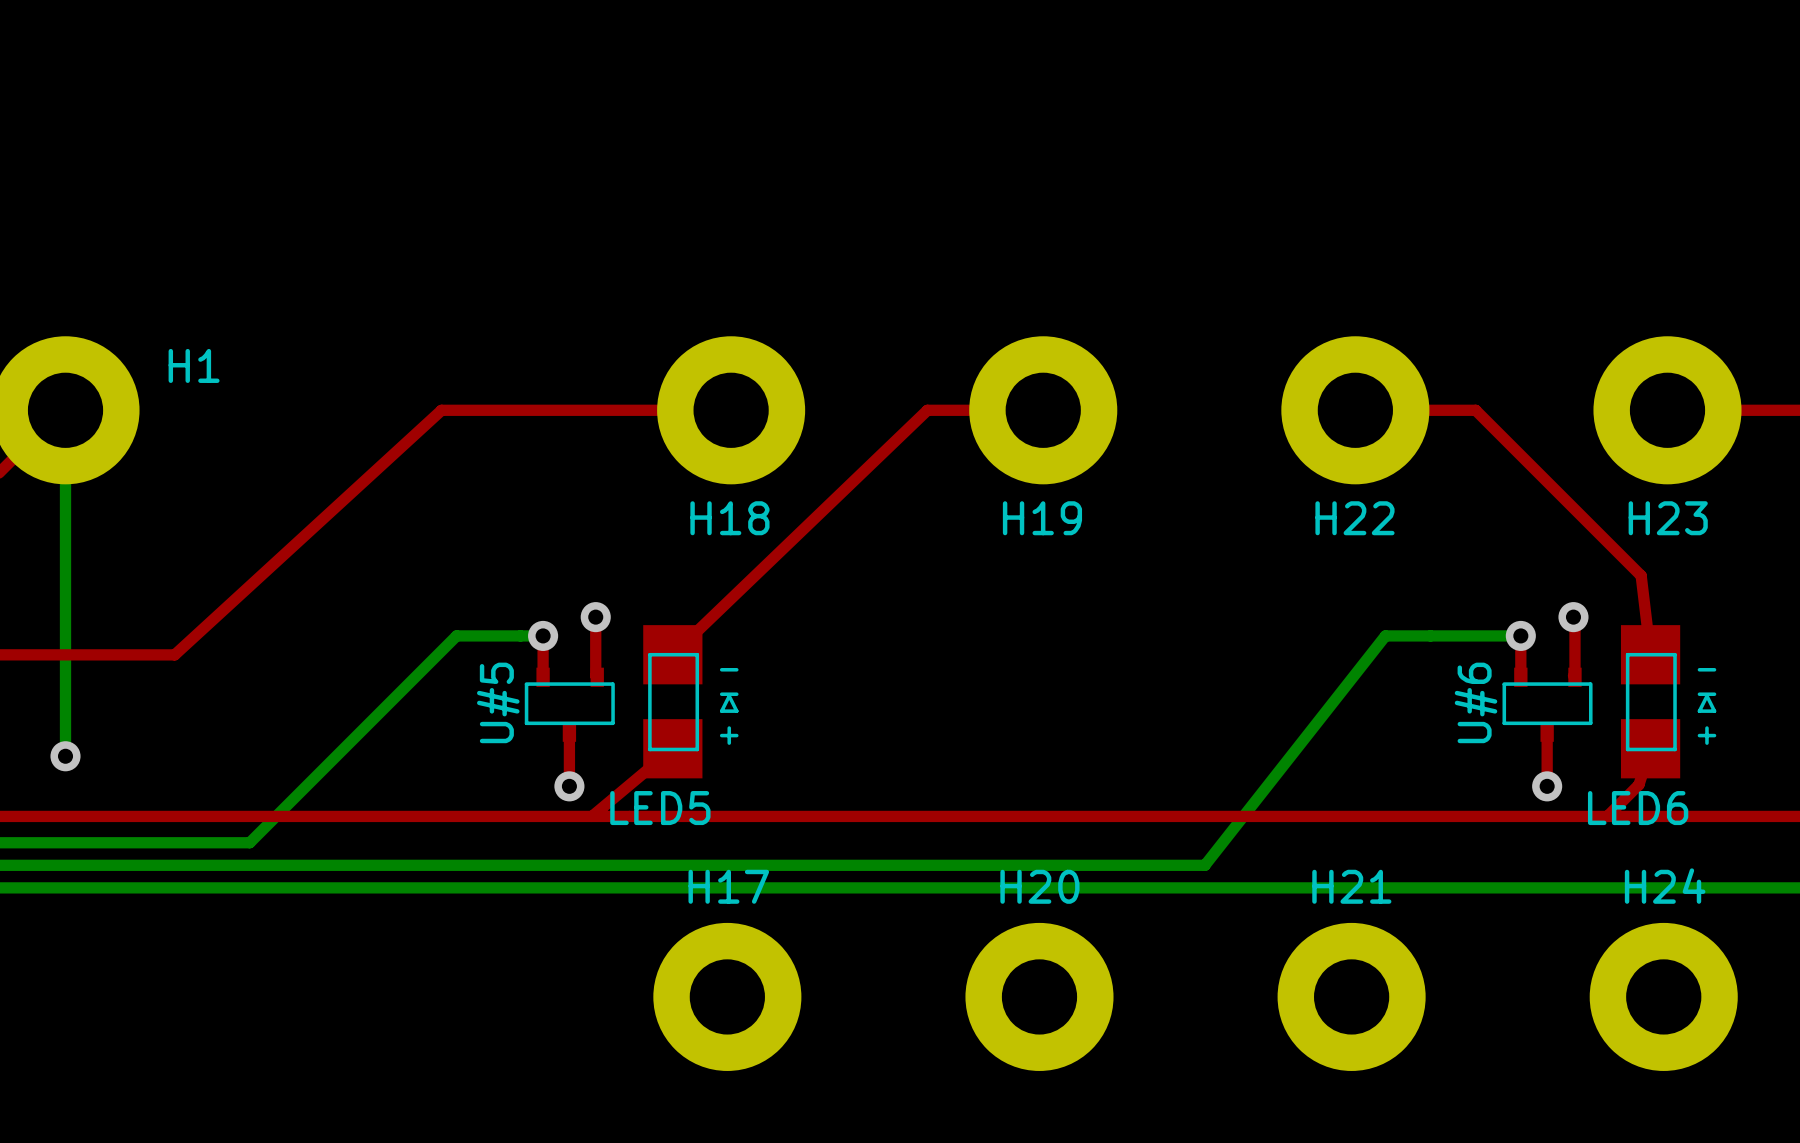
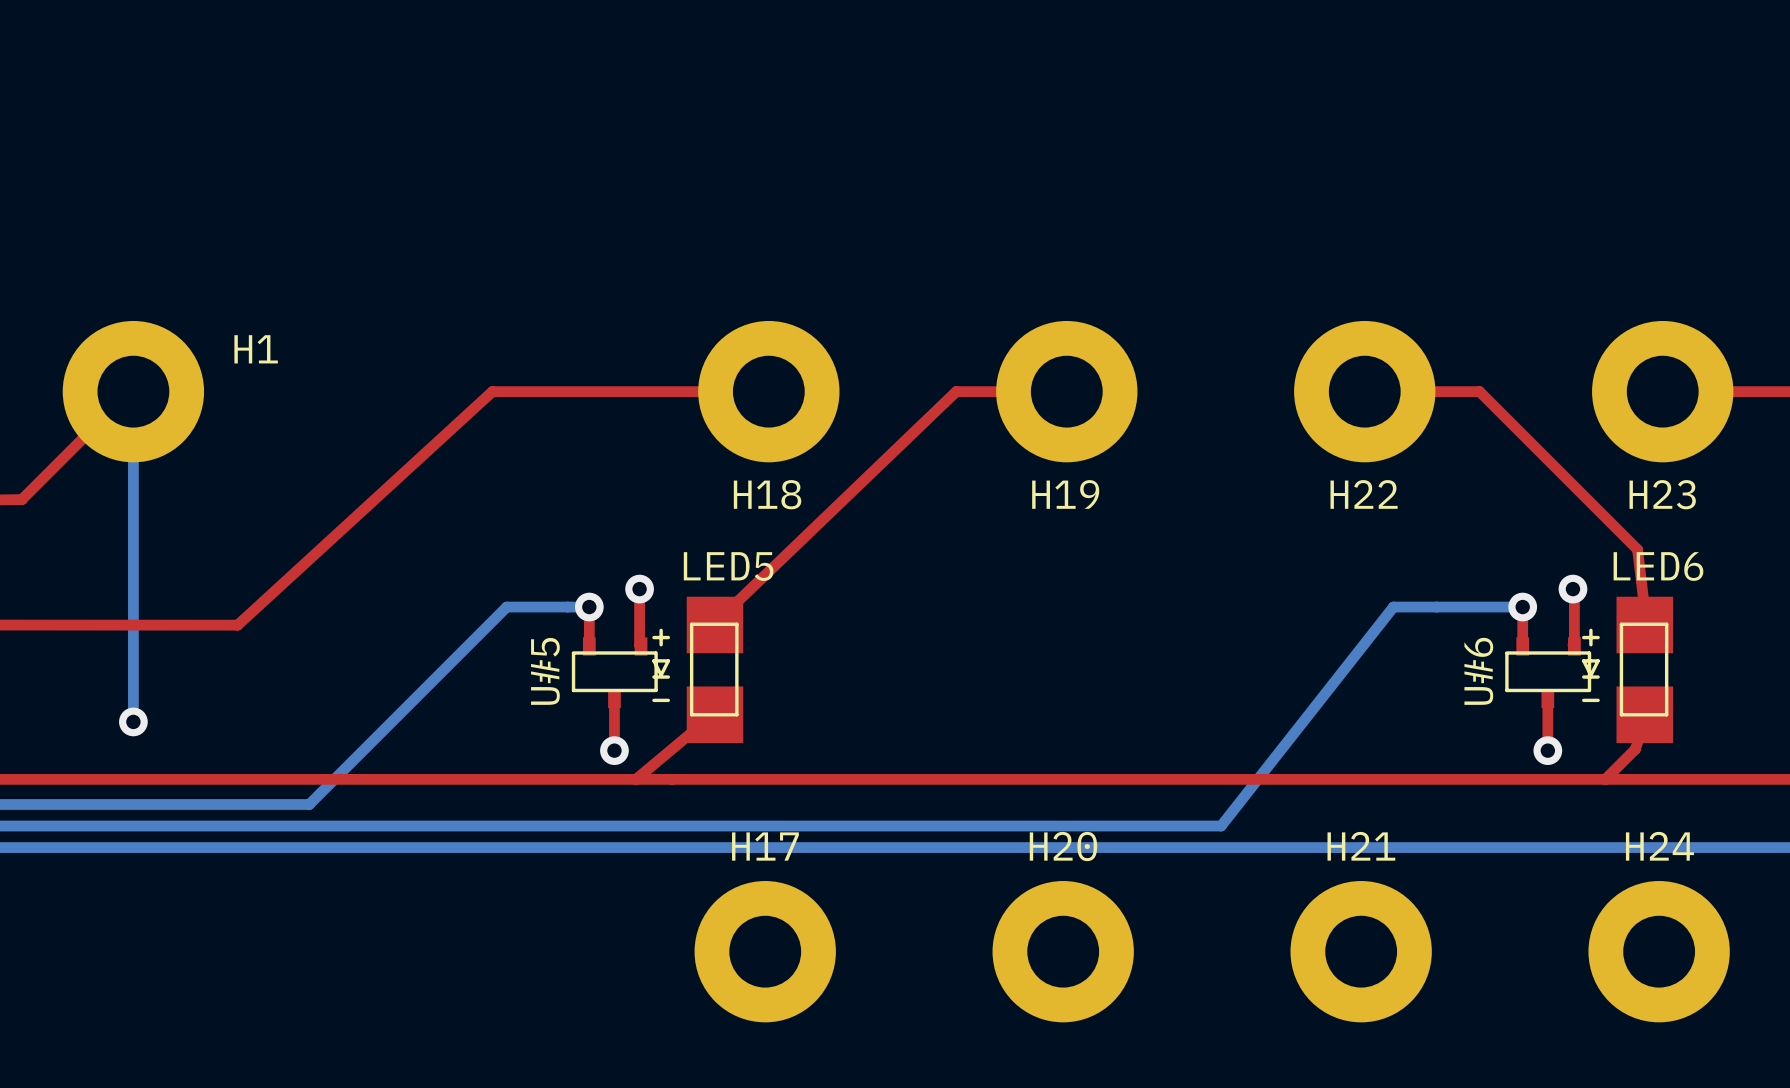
LED5 footprint: [643, 625, 739, 779] -> [652, 596, 744, 744]
LED6 footprint: [1620, 625, 1717, 779] -> [1582, 596, 1674, 744]
LED5 name position: LED5 (660, 808) -> LED5 (728, 566)
LED6 name position: LED6 (1638, 808) -> LED6 (1658, 566)

